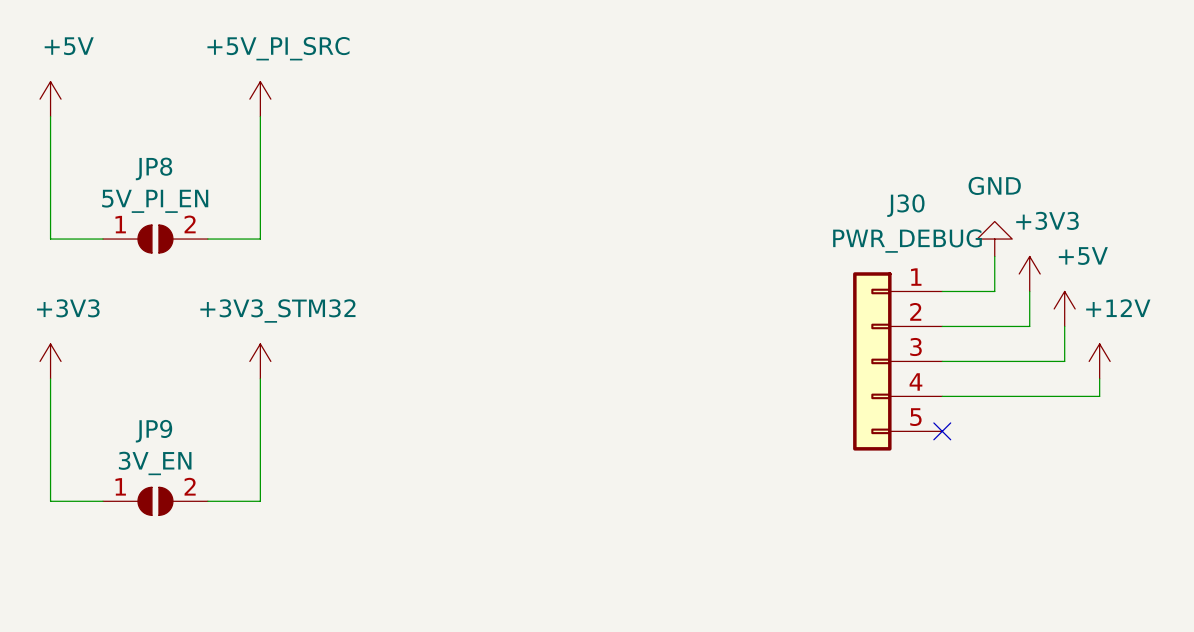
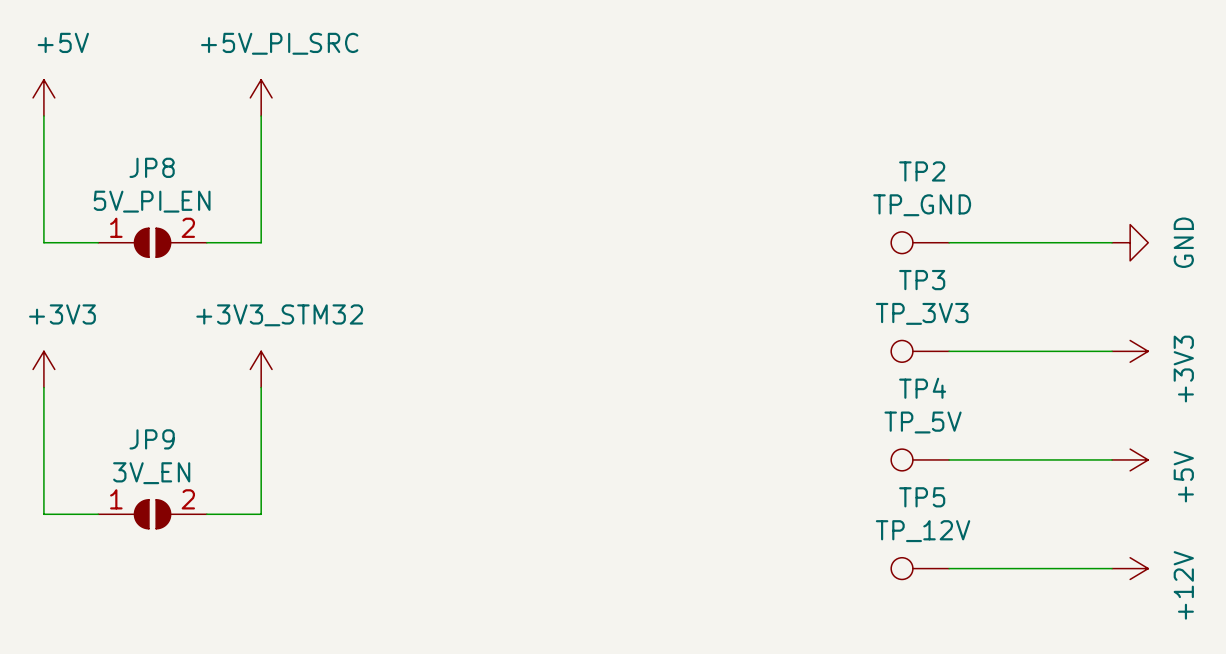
TP2: none -> TP_GND (920, 242)
wire: none -> (949, 242) (1112, 242)
power symbol rotation: 0° (994, 239) -> 90° clockwise (1130, 242)
power symbol position: GND (994, 239) -> GND (1130, 242)
wire: (994, 256) (994, 291) (942, 291) -> none
power symbol rotation: 0° (1029, 273) -> 90° clockwise (1130, 351)
power symbol position: +3V3 (1029, 273) -> +3V3 (1130, 351)
wire: (1029, 291) (1029, 326) (942, 326) -> none
power symbol rotation: 0° (1064, 308) -> 90° clockwise (1130, 459)
power symbol position: +5V (1064, 308) -> +5V (1130, 459)
wire: (1064, 326) (1064, 361) (942, 361) -> none
TP3: none -> TP_3V3 (920, 351)
wire: none -> (949, 351) (1112, 351)
J30: PWR_DEBUG (897, 361) -> none
power symbol rotation: 0° (1099, 361) -> 90° clockwise (1130, 568)
power symbol position: +12V (1099, 361) -> +12V (1130, 568)
wire: (1099, 378) (1099, 396) (942, 396) -> none
no-connect mark: (942, 431) -> none
TP4: none -> TP_5V (920, 459)
wire: none -> (949, 459) (1112, 459)
TP5: none -> TP_12V (920, 568)
wire: none -> (949, 568) (1112, 568)

